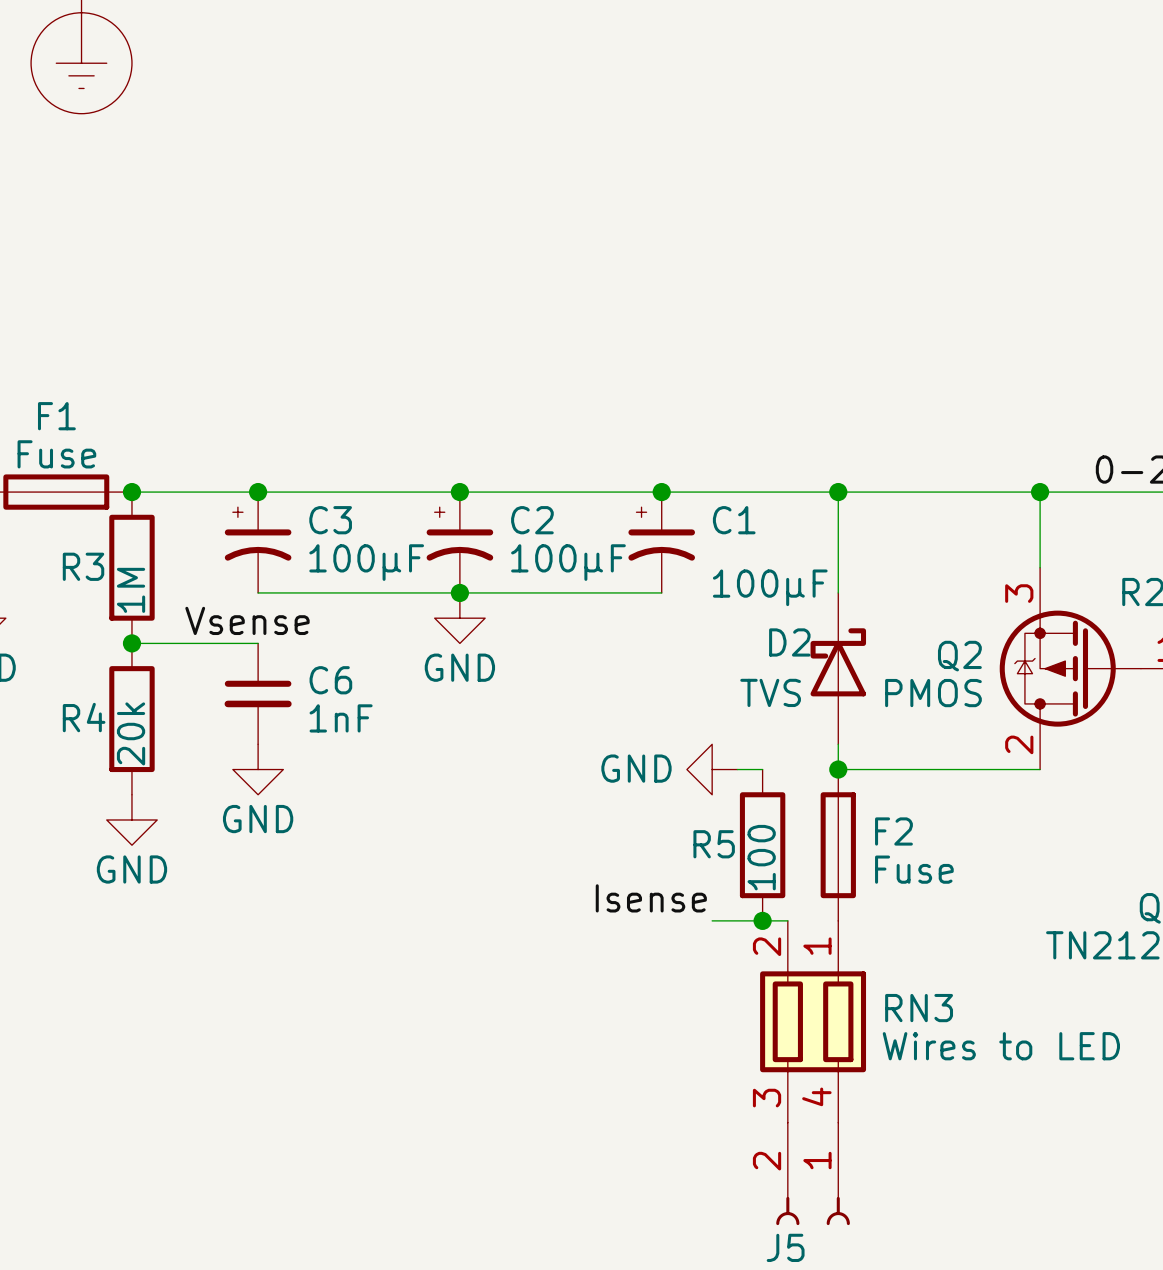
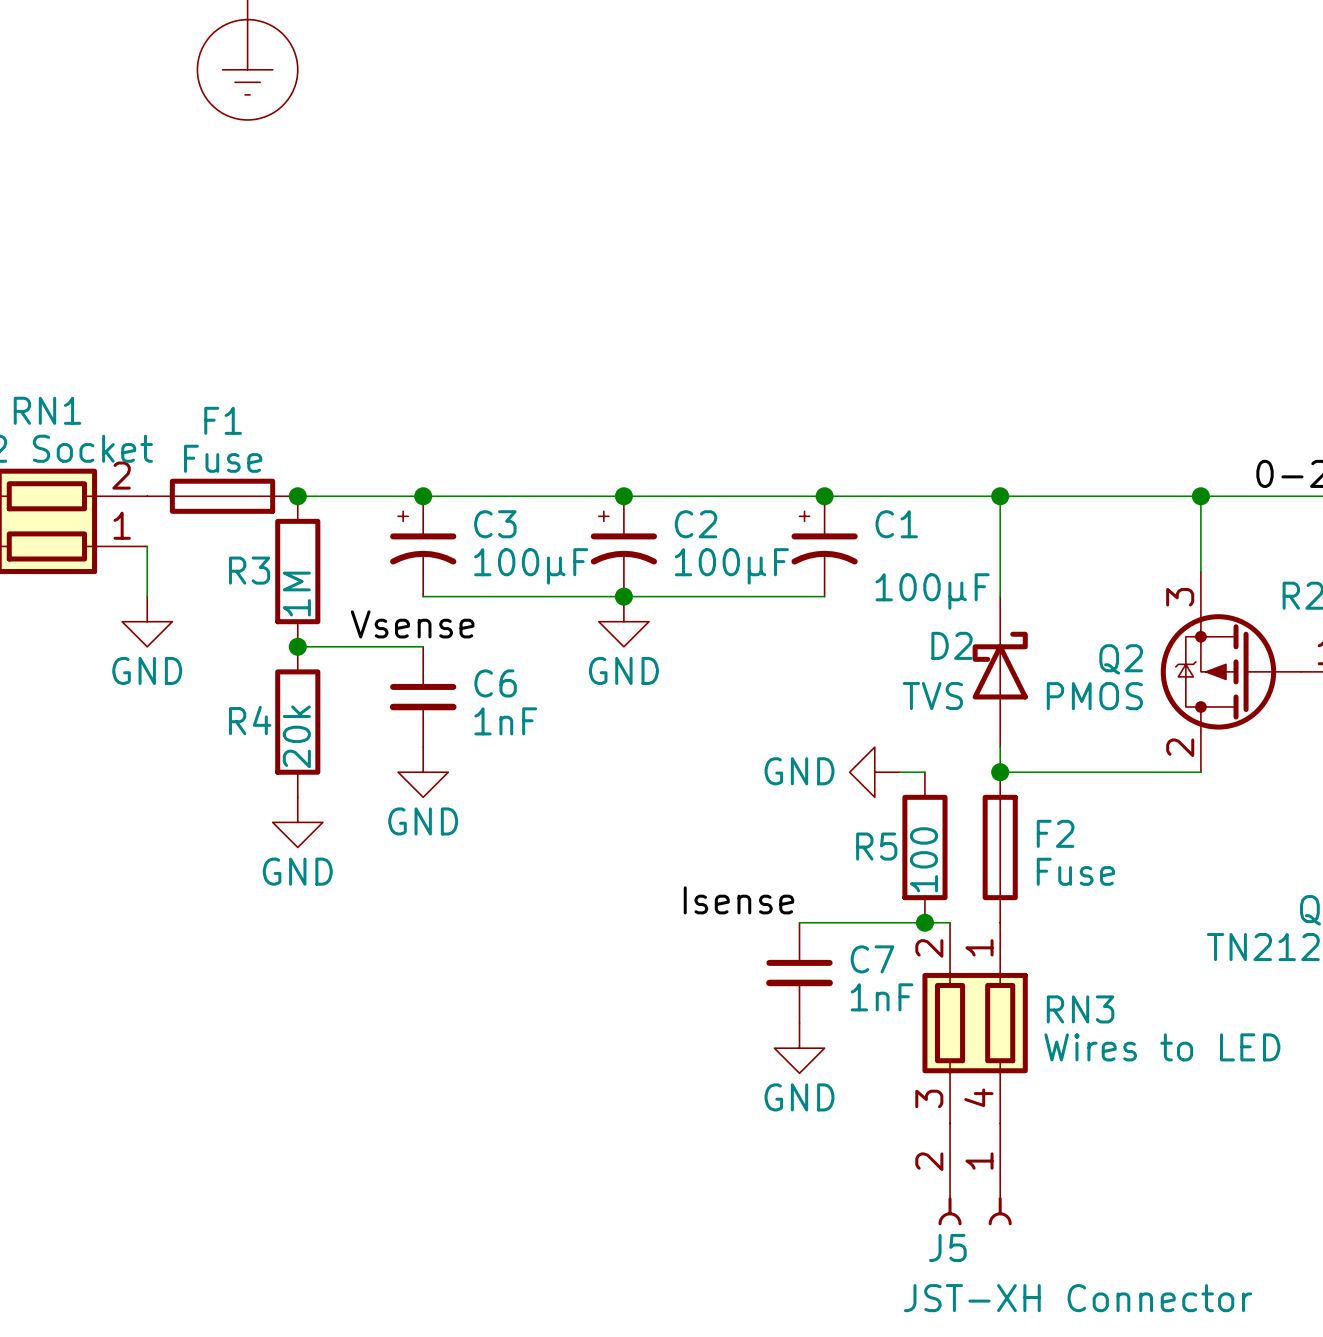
label position: Isense (651, 898) -> Isense (738, 900)
wire: none -> (799, 922) (874, 922)
C7: none -> 1nF (799, 972)
power symbol: none -> GND (799, 1048)

